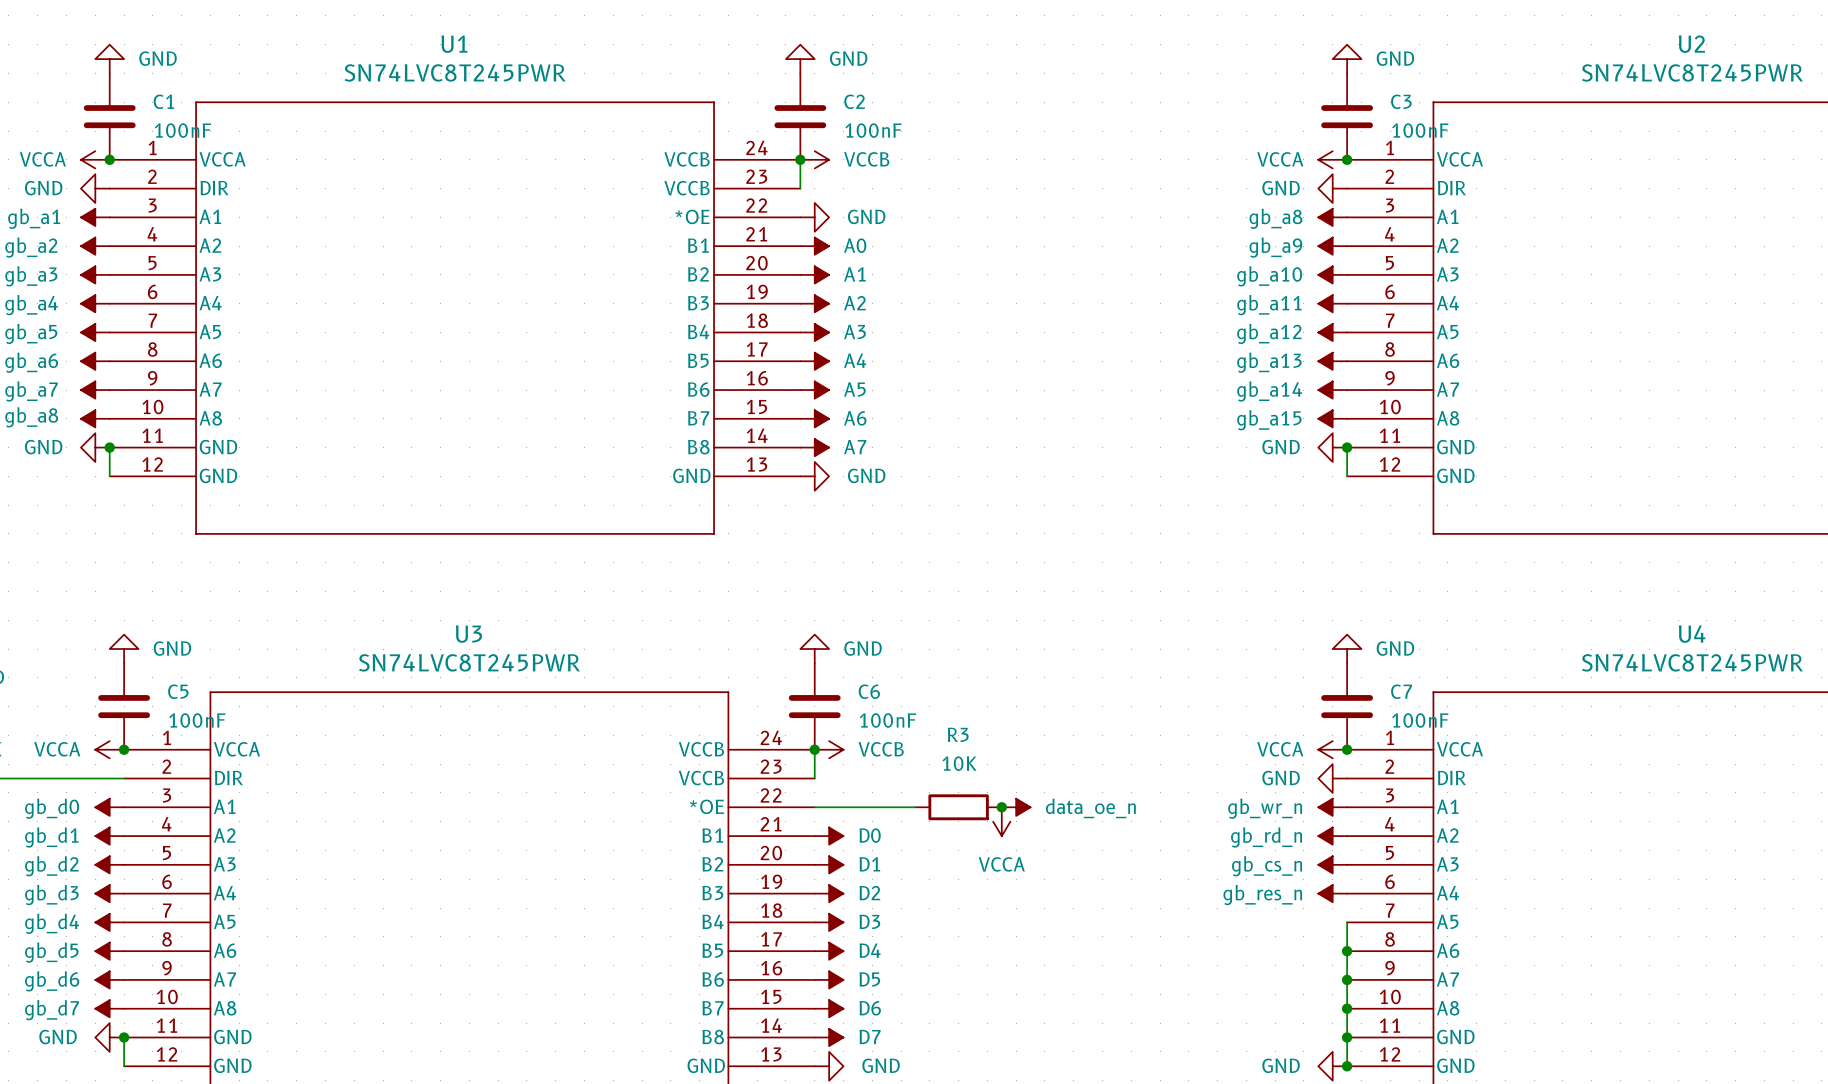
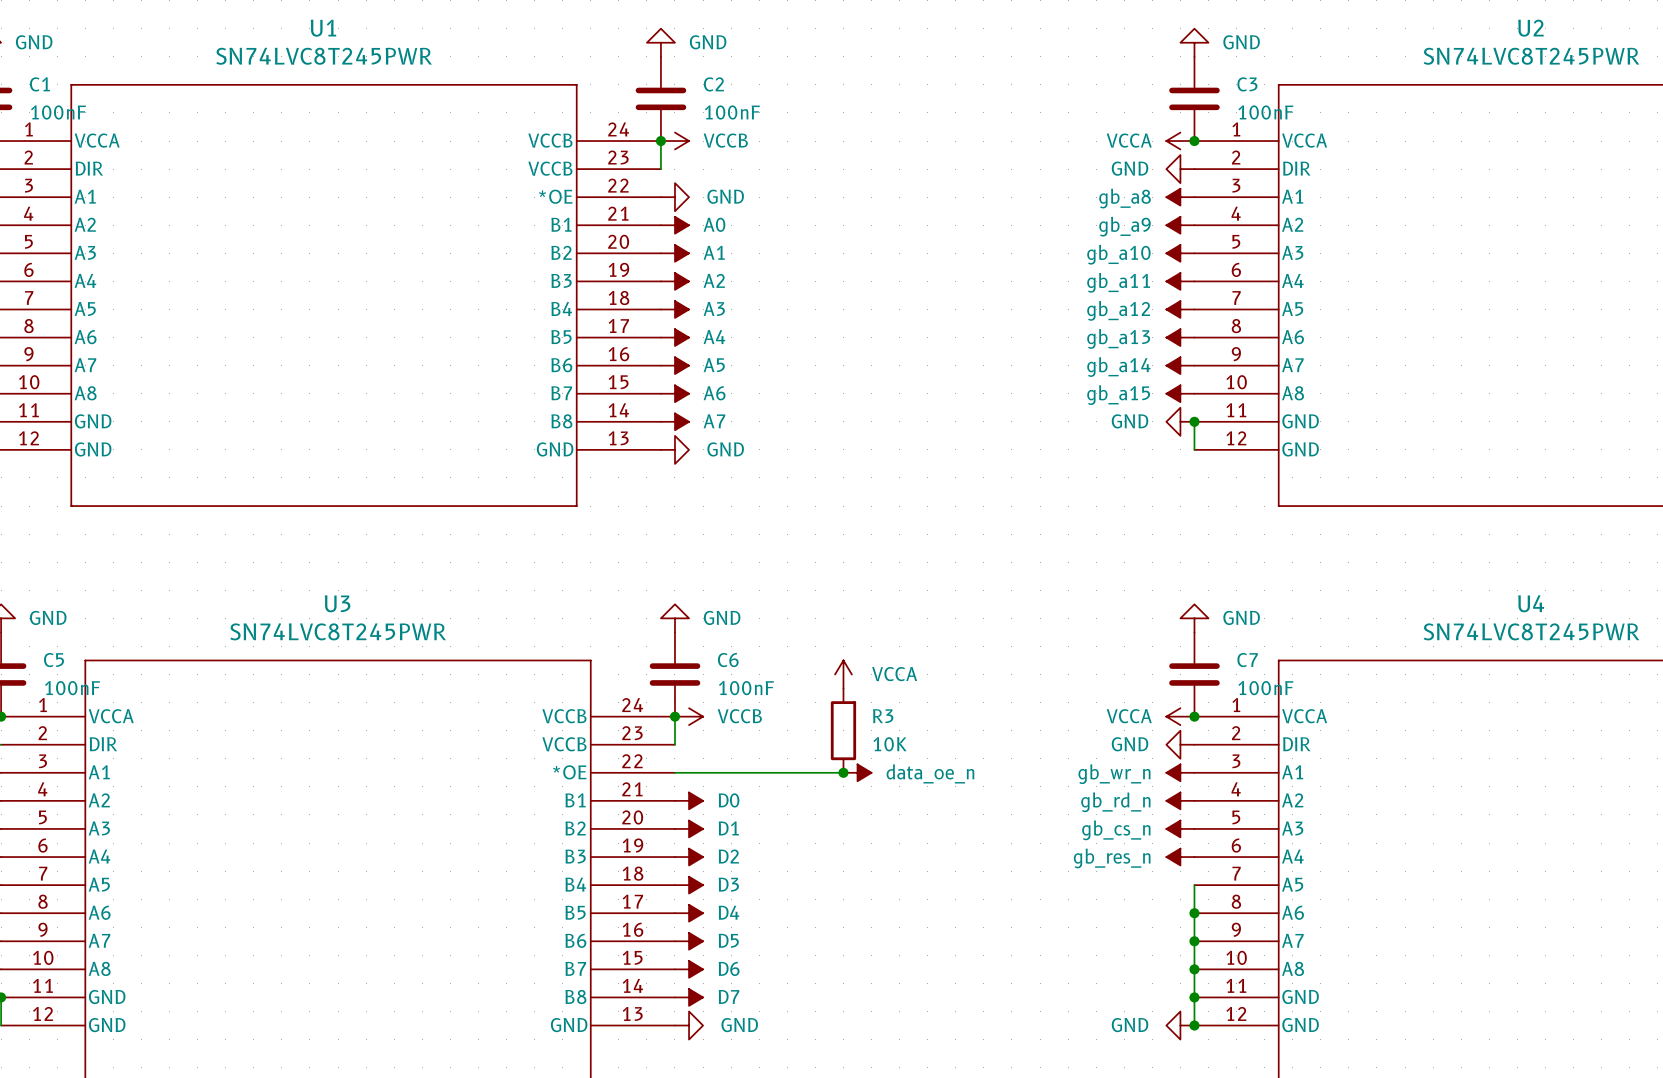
R3 name position: R3 (958, 734) -> R3 (883, 716)
wire: none -> (773, 772) (843, 772)
R3 rotation: 0° (958, 807) -> 90° clockwise (843, 730)
R3 position: (958, 807) -> (843, 730)
junction position: (1001, 807) -> (843, 772)
power symbol position: data_oe_n (1016, 807) -> data_oe_n (857, 772)
power symbol rotation: 0° (1001, 821) -> 180° (843, 674)
power symbol position: VCCA (1001, 821) -> VCCA (843, 674)
power symbol text position: VCCA (1001, 864) -> VCCA (894, 674)

